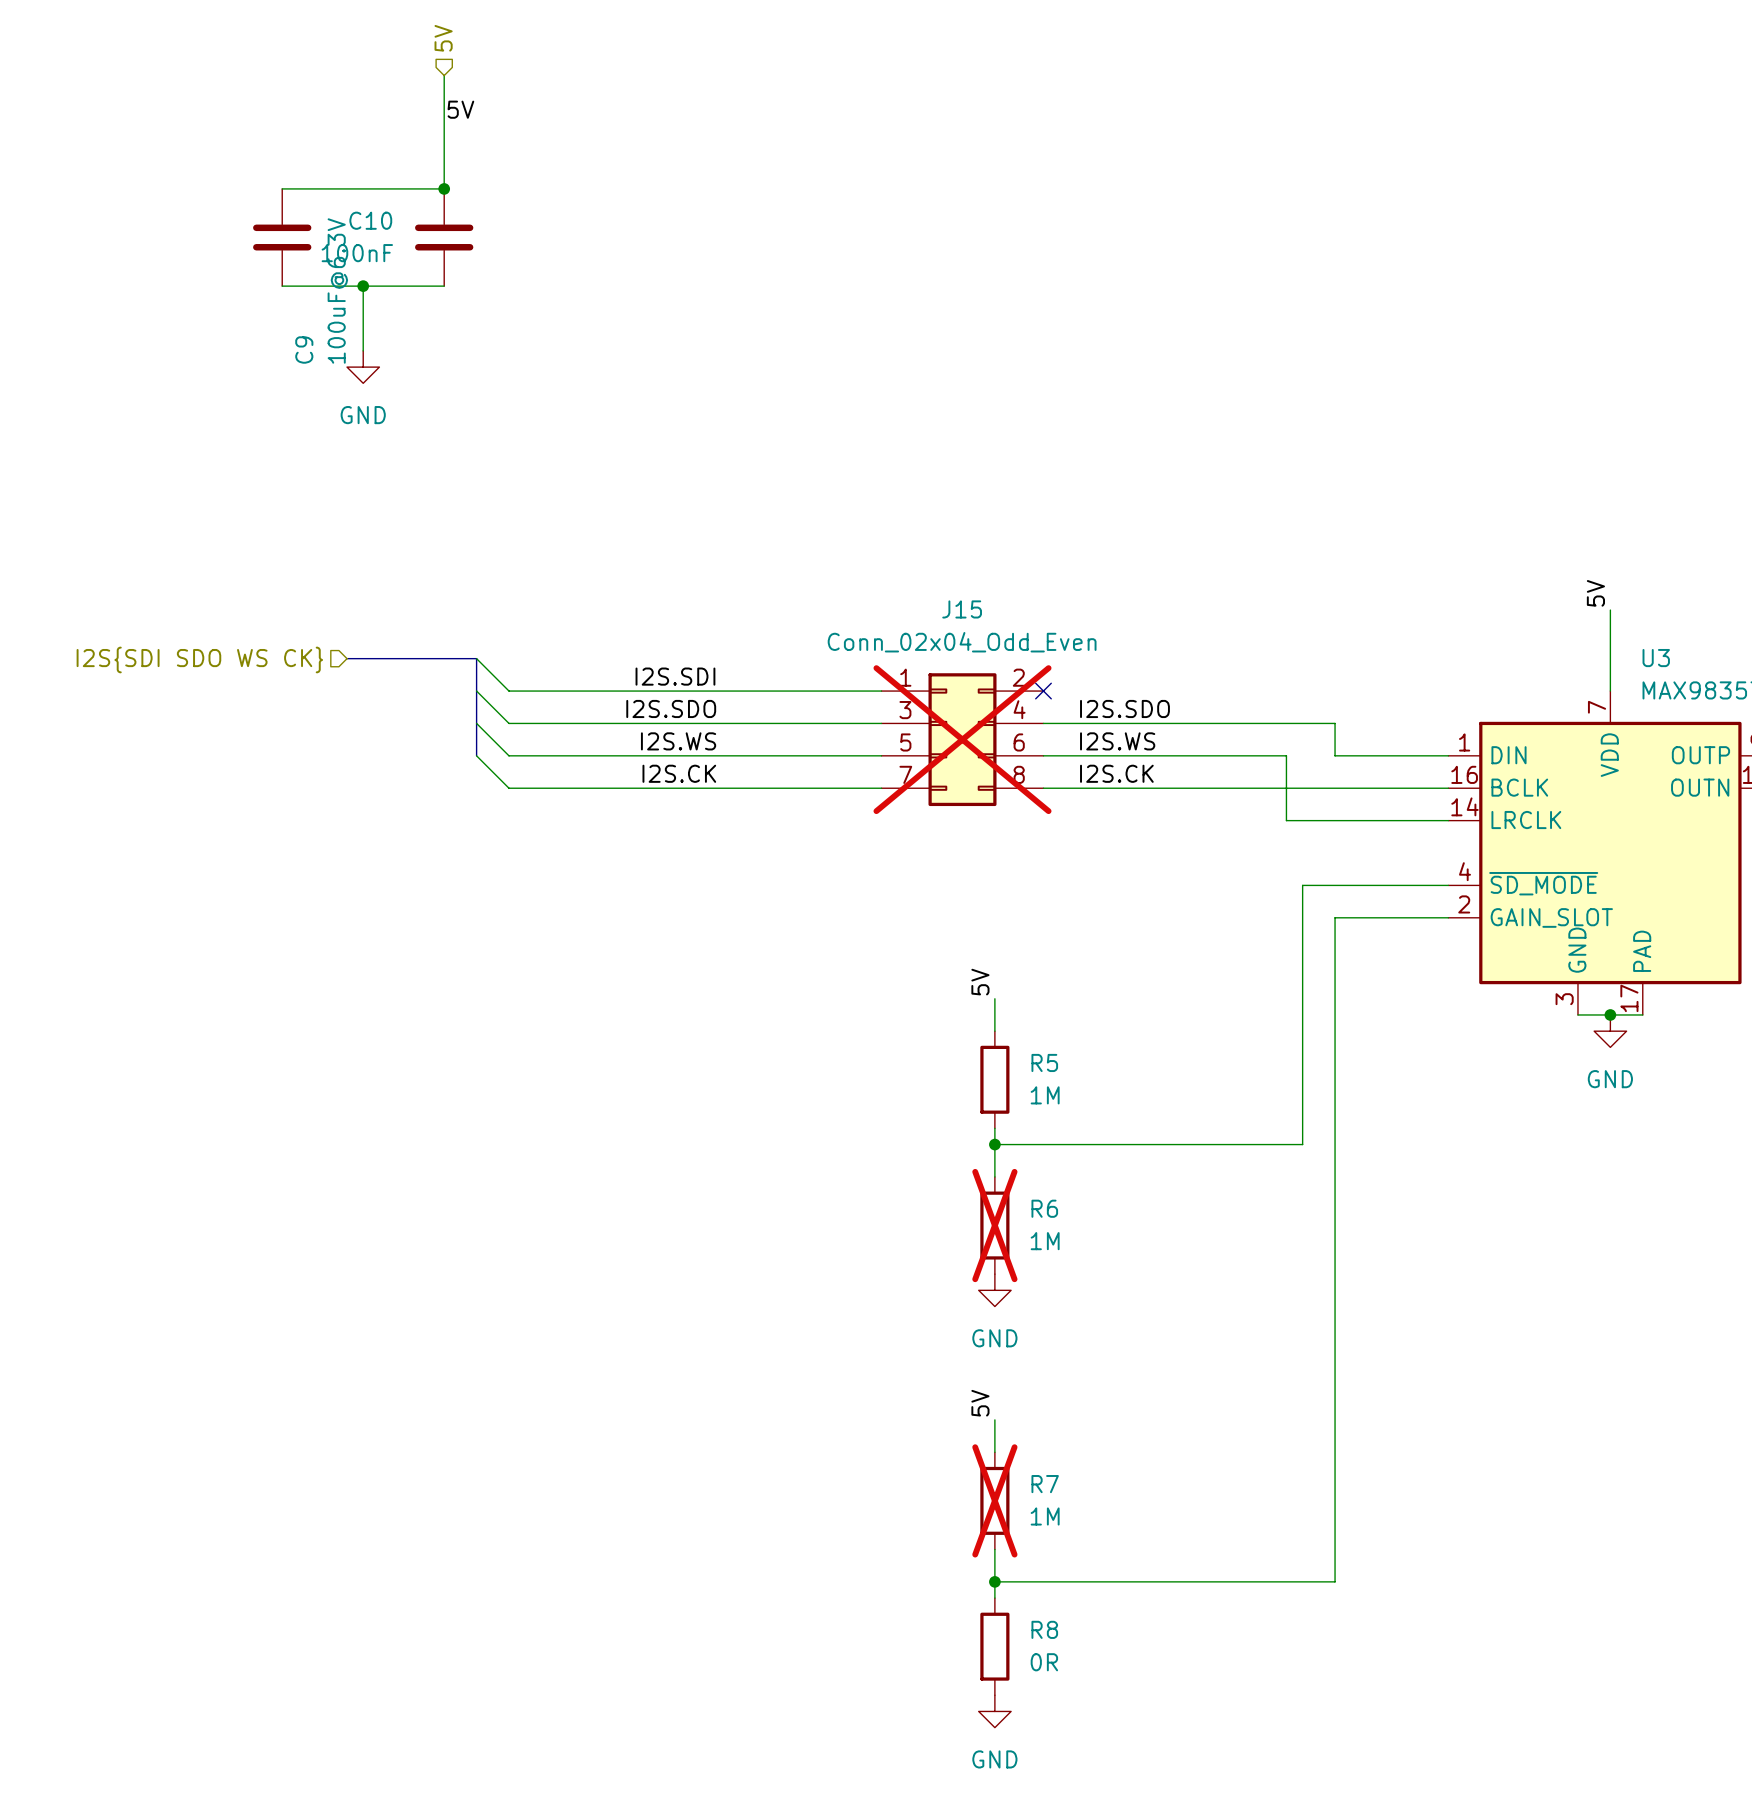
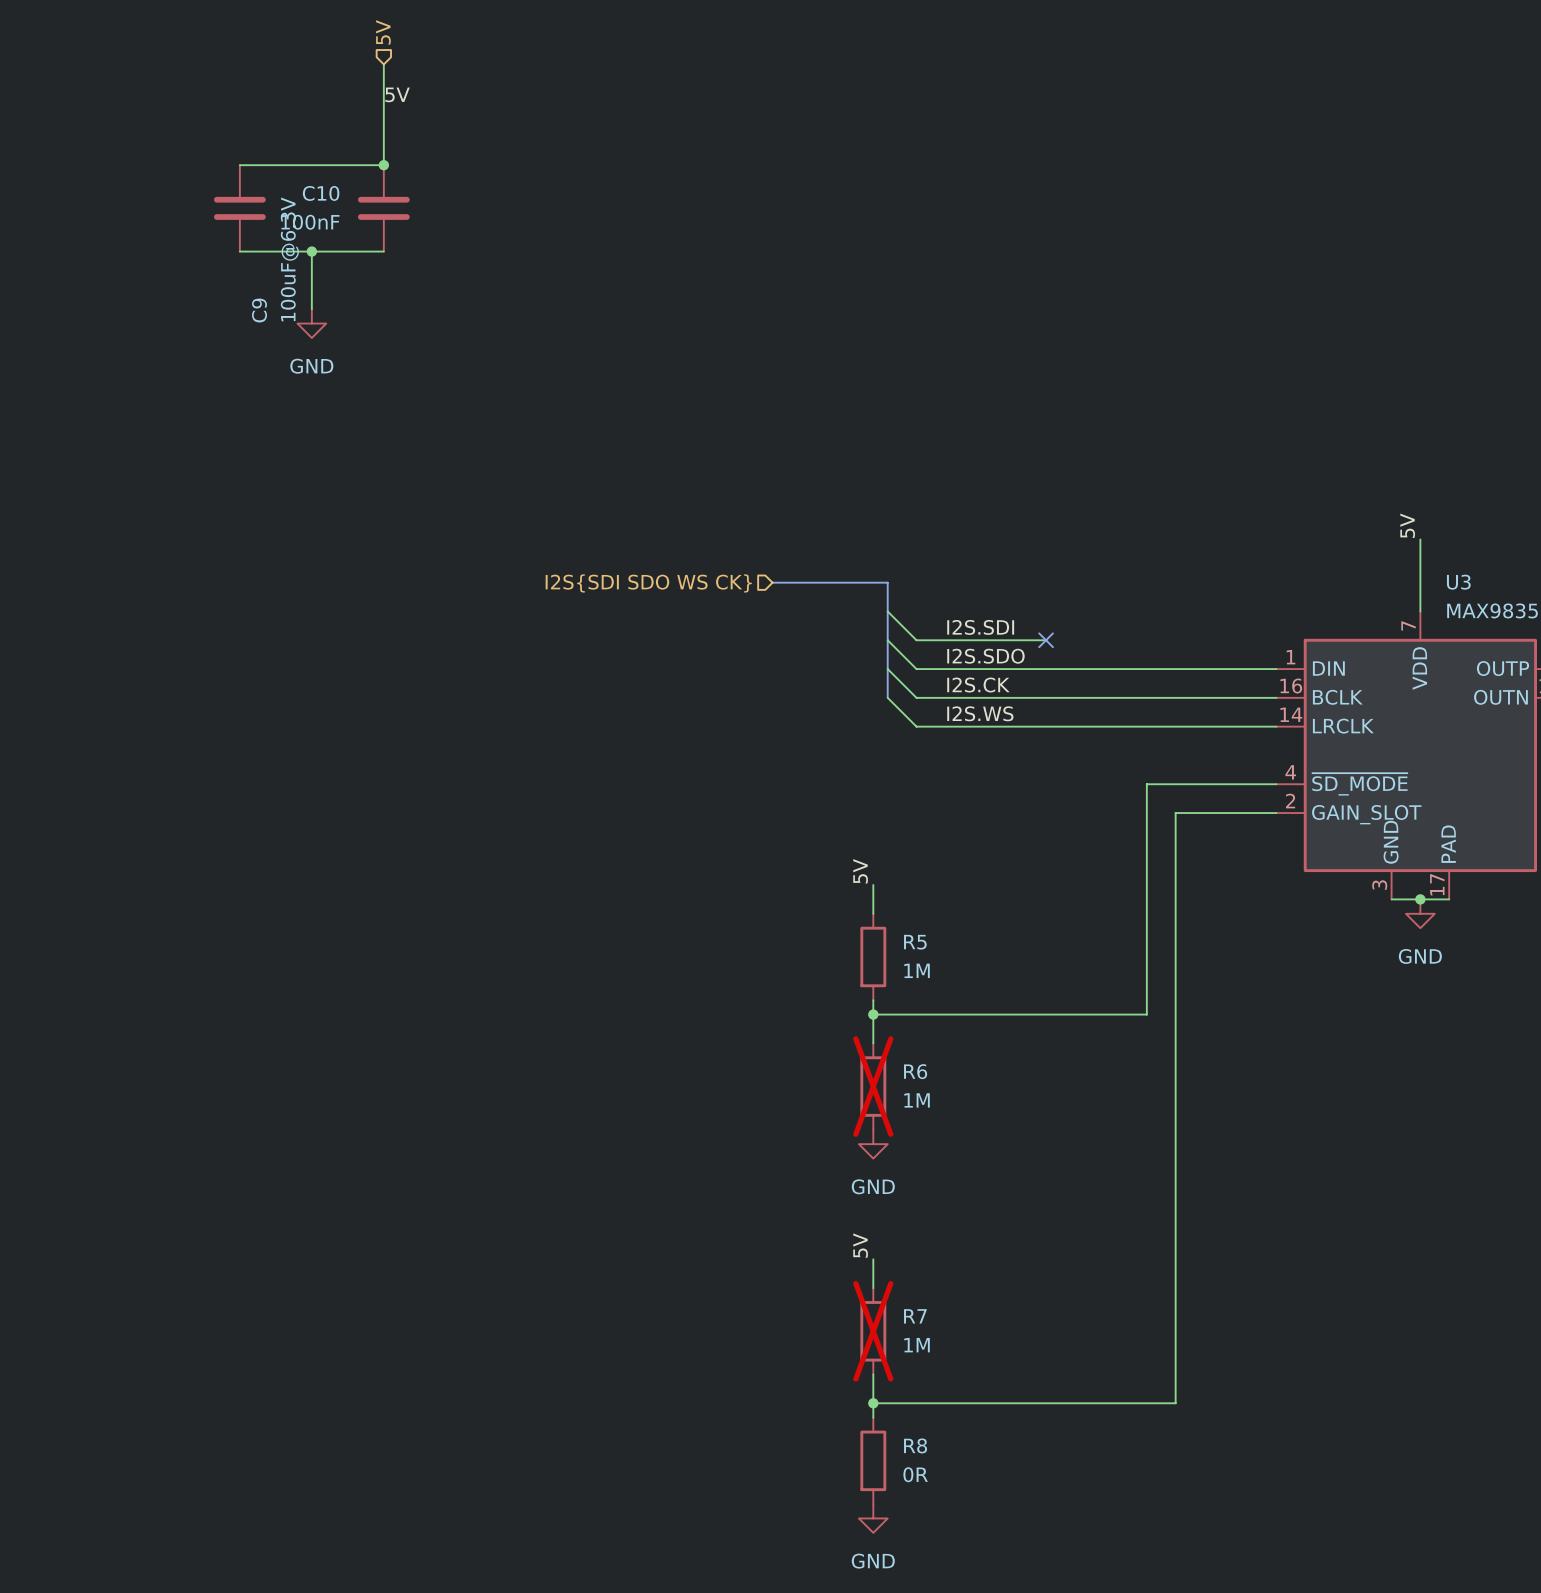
bus: (347, 658) (476, 658) (476, 755) -> none
wire: (476, 658) (508, 691) (881, 691) -> none
bus: none -> (772, 582) (887, 582) (887, 697)
hierarchical label: I2S{SDI SDO WS CK} (199, 659) -> none
hierarchical label: none -> I2S{SDI SDO WS CK} (648, 583)
label: I2S.SDI (675, 676) -> none
wire: (476, 691) (508, 723) (881, 723) -> none
wire: none -> (887, 611) (916, 640)
no-connect mark: (1043, 691) -> none
label: I2S.SDO (671, 708) -> none
label: I2S.SDO (1124, 708) -> I2S.SDI (980, 627)
wire: (476, 723) (508, 755) (881, 755) -> none
wire: none -> (887, 640) (916, 669)
wire: (1189, 723) (1335, 723) (1335, 755) -> none
no-connect mark: none -> (1046, 640)
J15: Conn_02x04_Odd_Even (962, 739) -> none
label: I2S.WS (678, 741) -> none
label: I2S.WS (1117, 741) -> I2S.SDO (985, 656)
wire: (476, 755) (508, 788) (881, 788) -> none
wire: none -> (887, 669) (916, 697)
wire: (1286, 755) (1286, 820) -> (1132, 669) (1175, 669)
label: I2S.CK (679, 773) -> none
wire: none -> (887, 697) (916, 726) (1132, 726)
label: none -> I2S.WS (980, 713)

